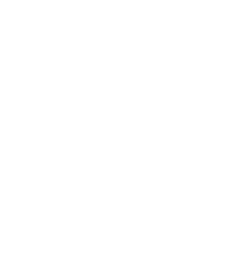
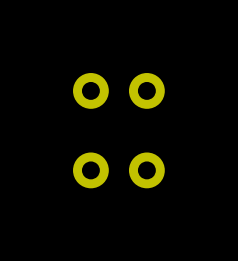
part: none -> (118, 90)
part: none -> (118, 170)

